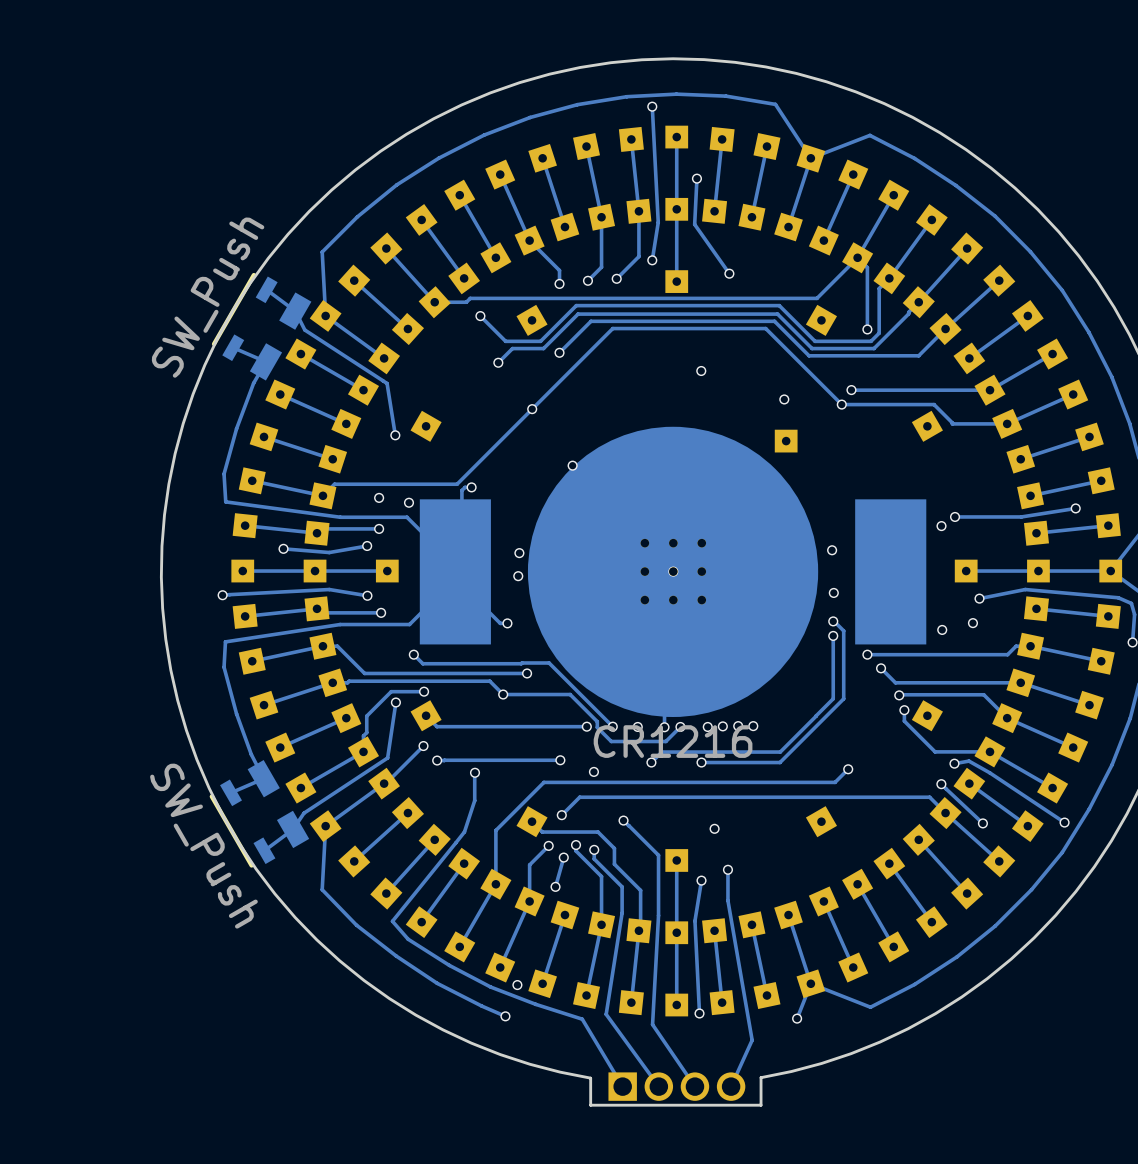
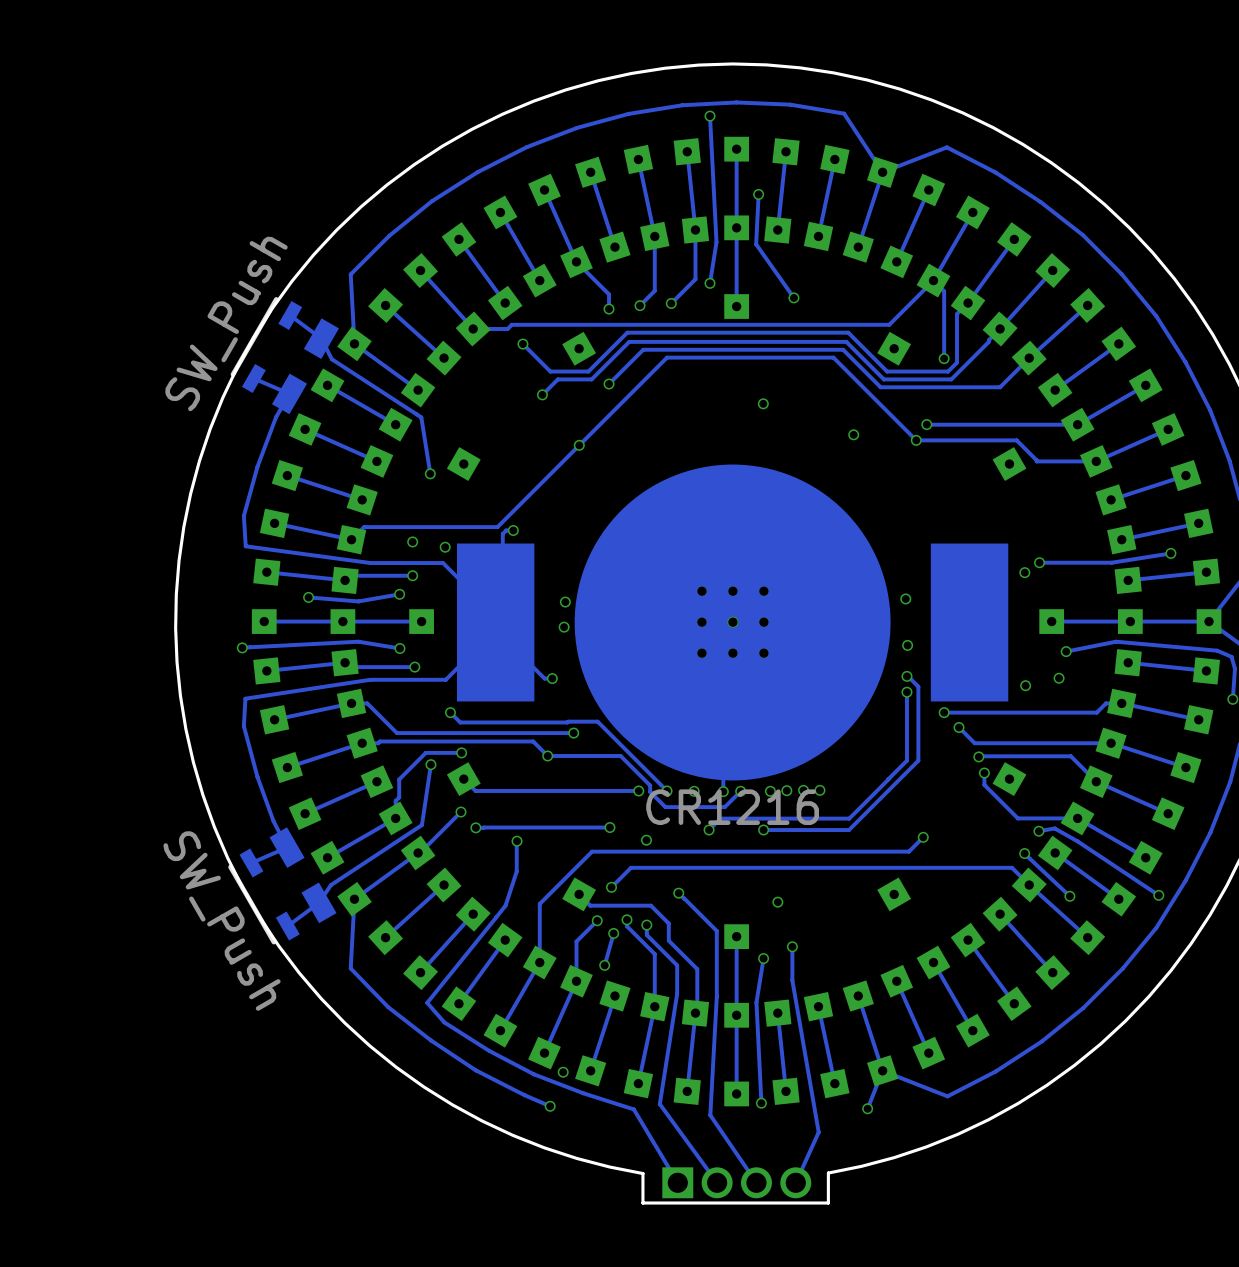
part: (786, 441) -> none
via: (572, 465) -> none

